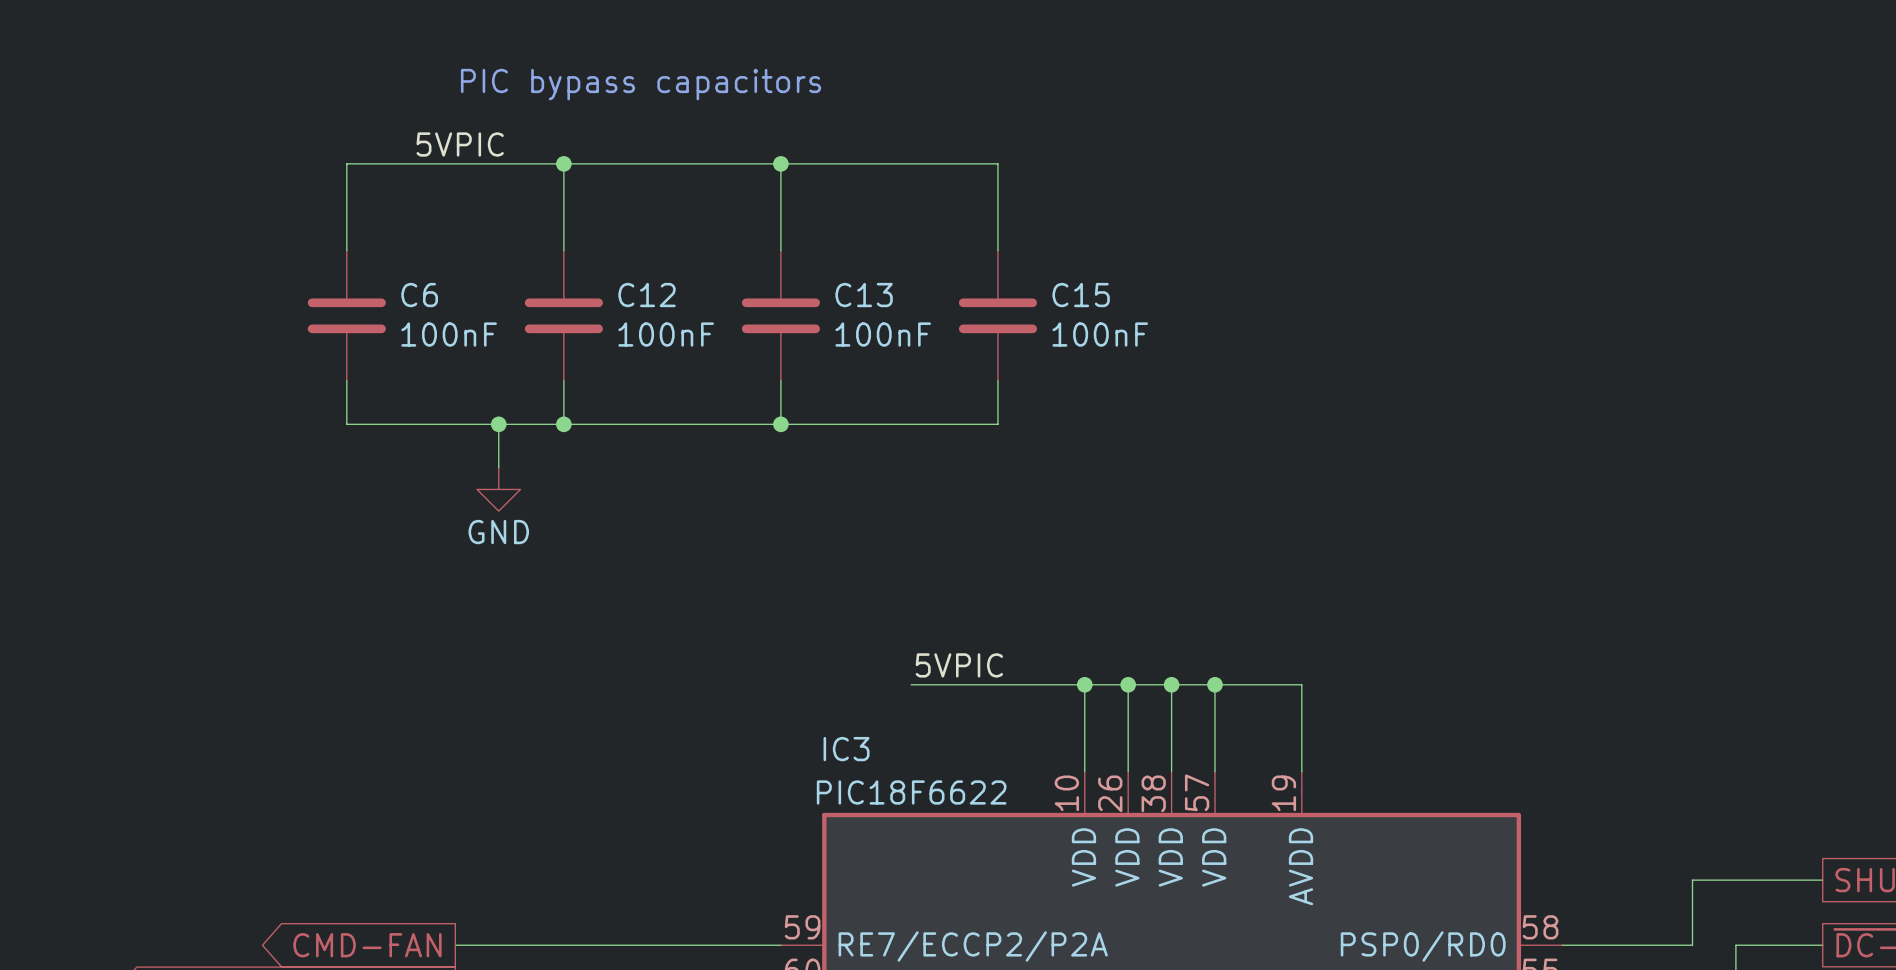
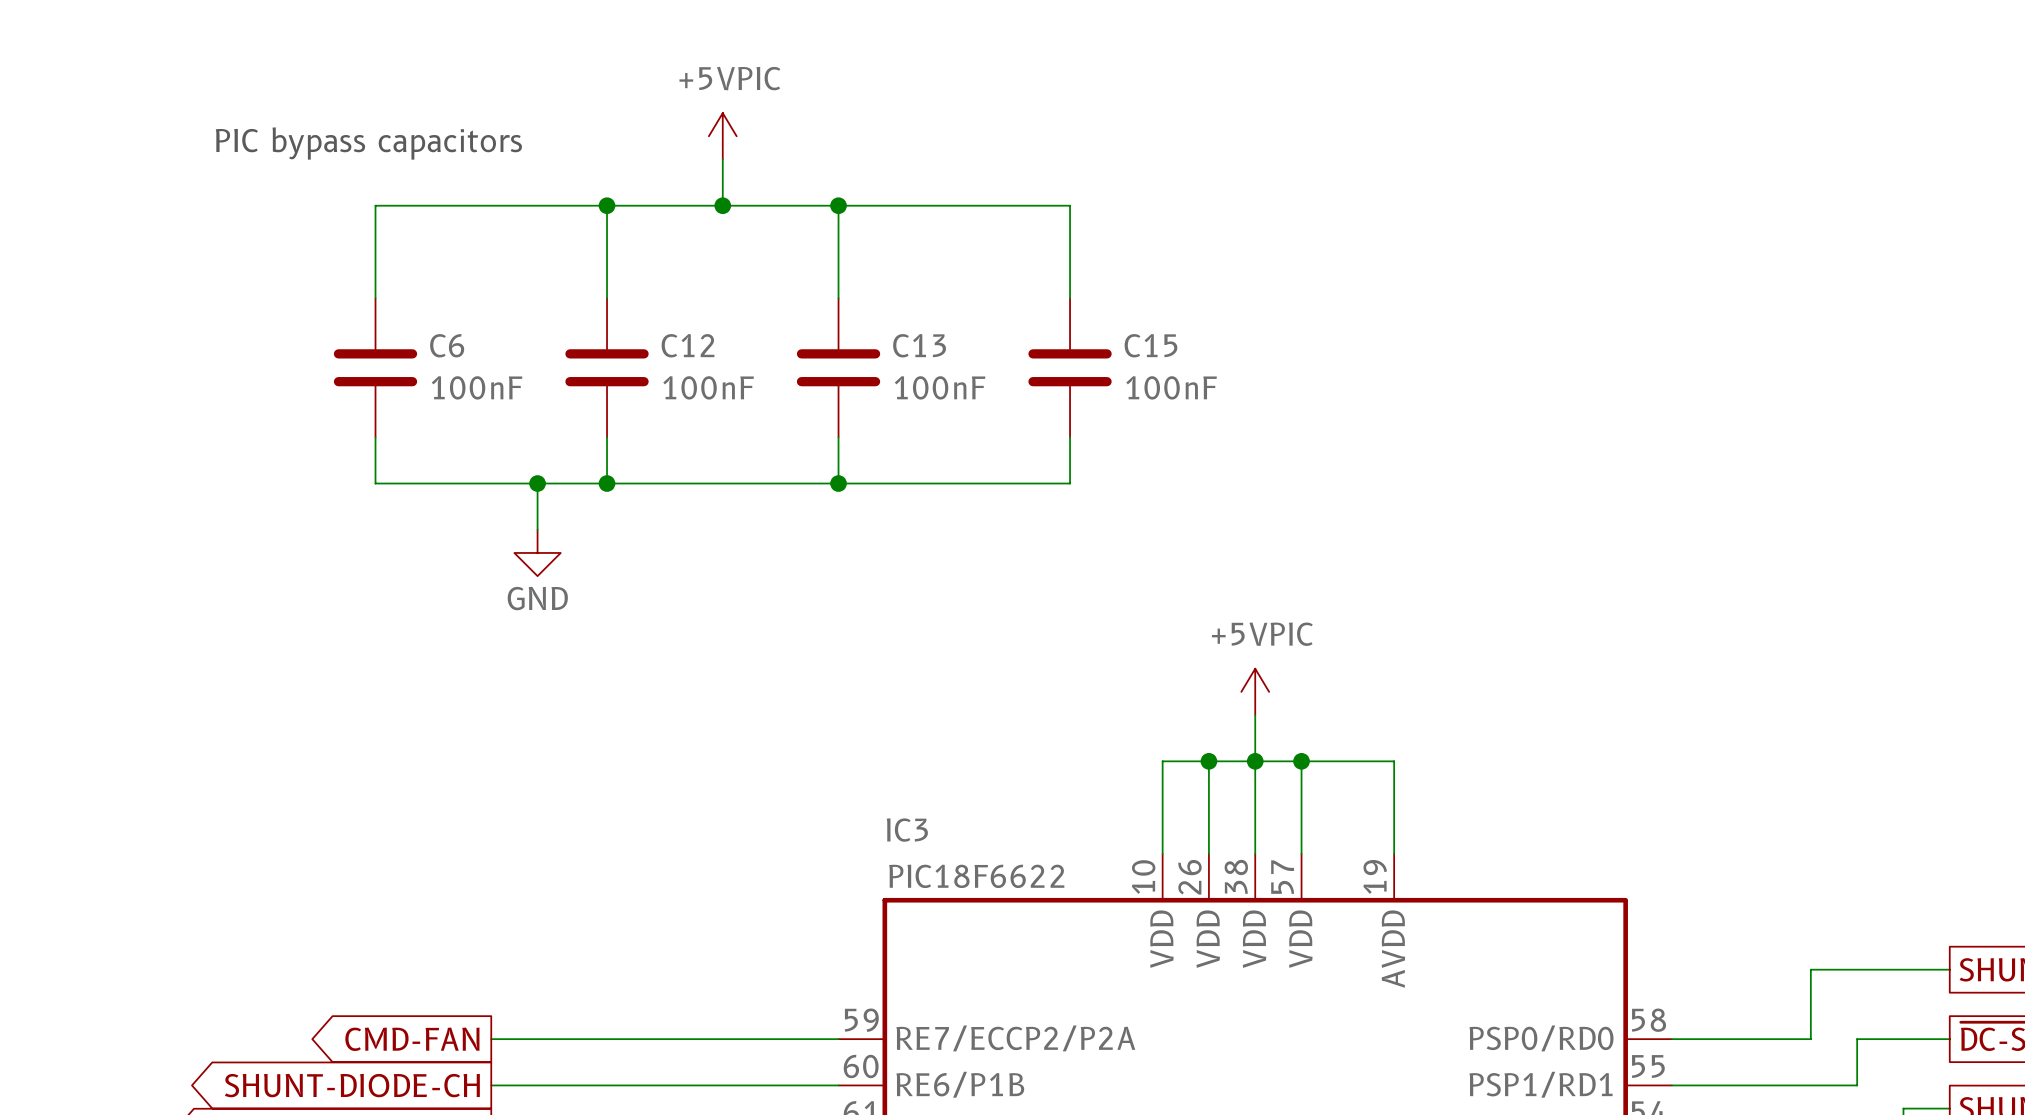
text position: PIC bypass capacitors (641, 84) -> PIC bypass capacitors (368, 143)
power symbol: none -> +5VPIC (722, 136)
wire: none -> (722, 159) (722, 205)
label: 5VPIC (460, 144) -> none
junction: none -> (722, 205)
power symbol: none -> +5VPIC (1255, 691)
wire: none -> (1255, 715) (1255, 761)
label: 5VPIC (959, 665) -> none
wire: (911, 684) (1084, 684) -> none
junction: (1084, 684) -> none

